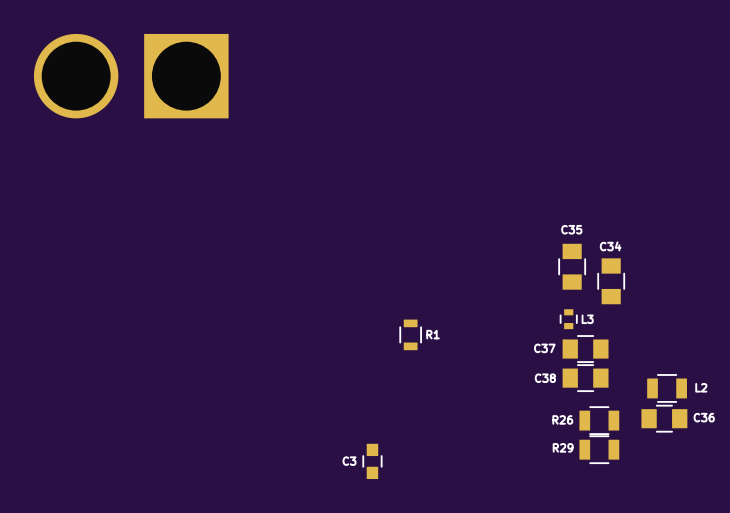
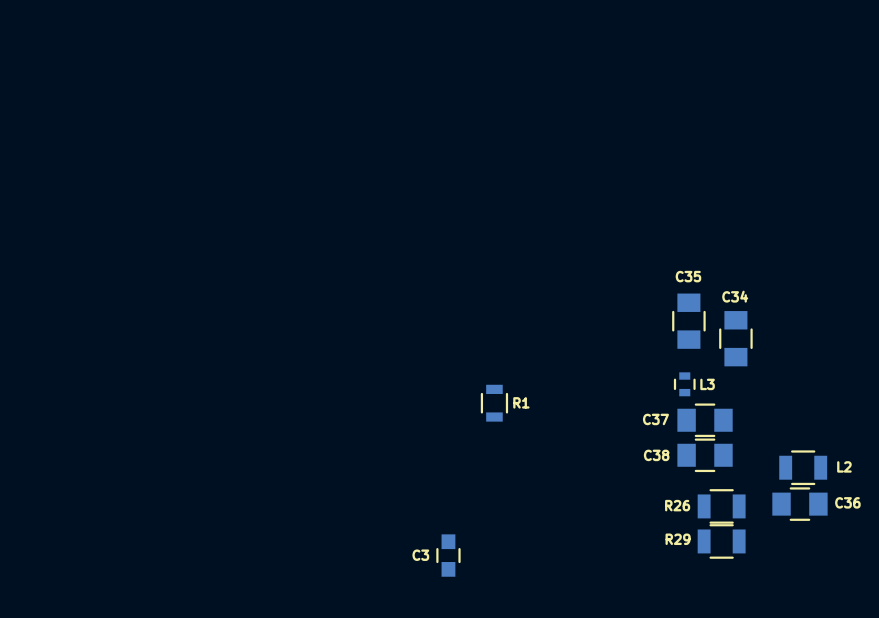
part: (131, 76) -> none

